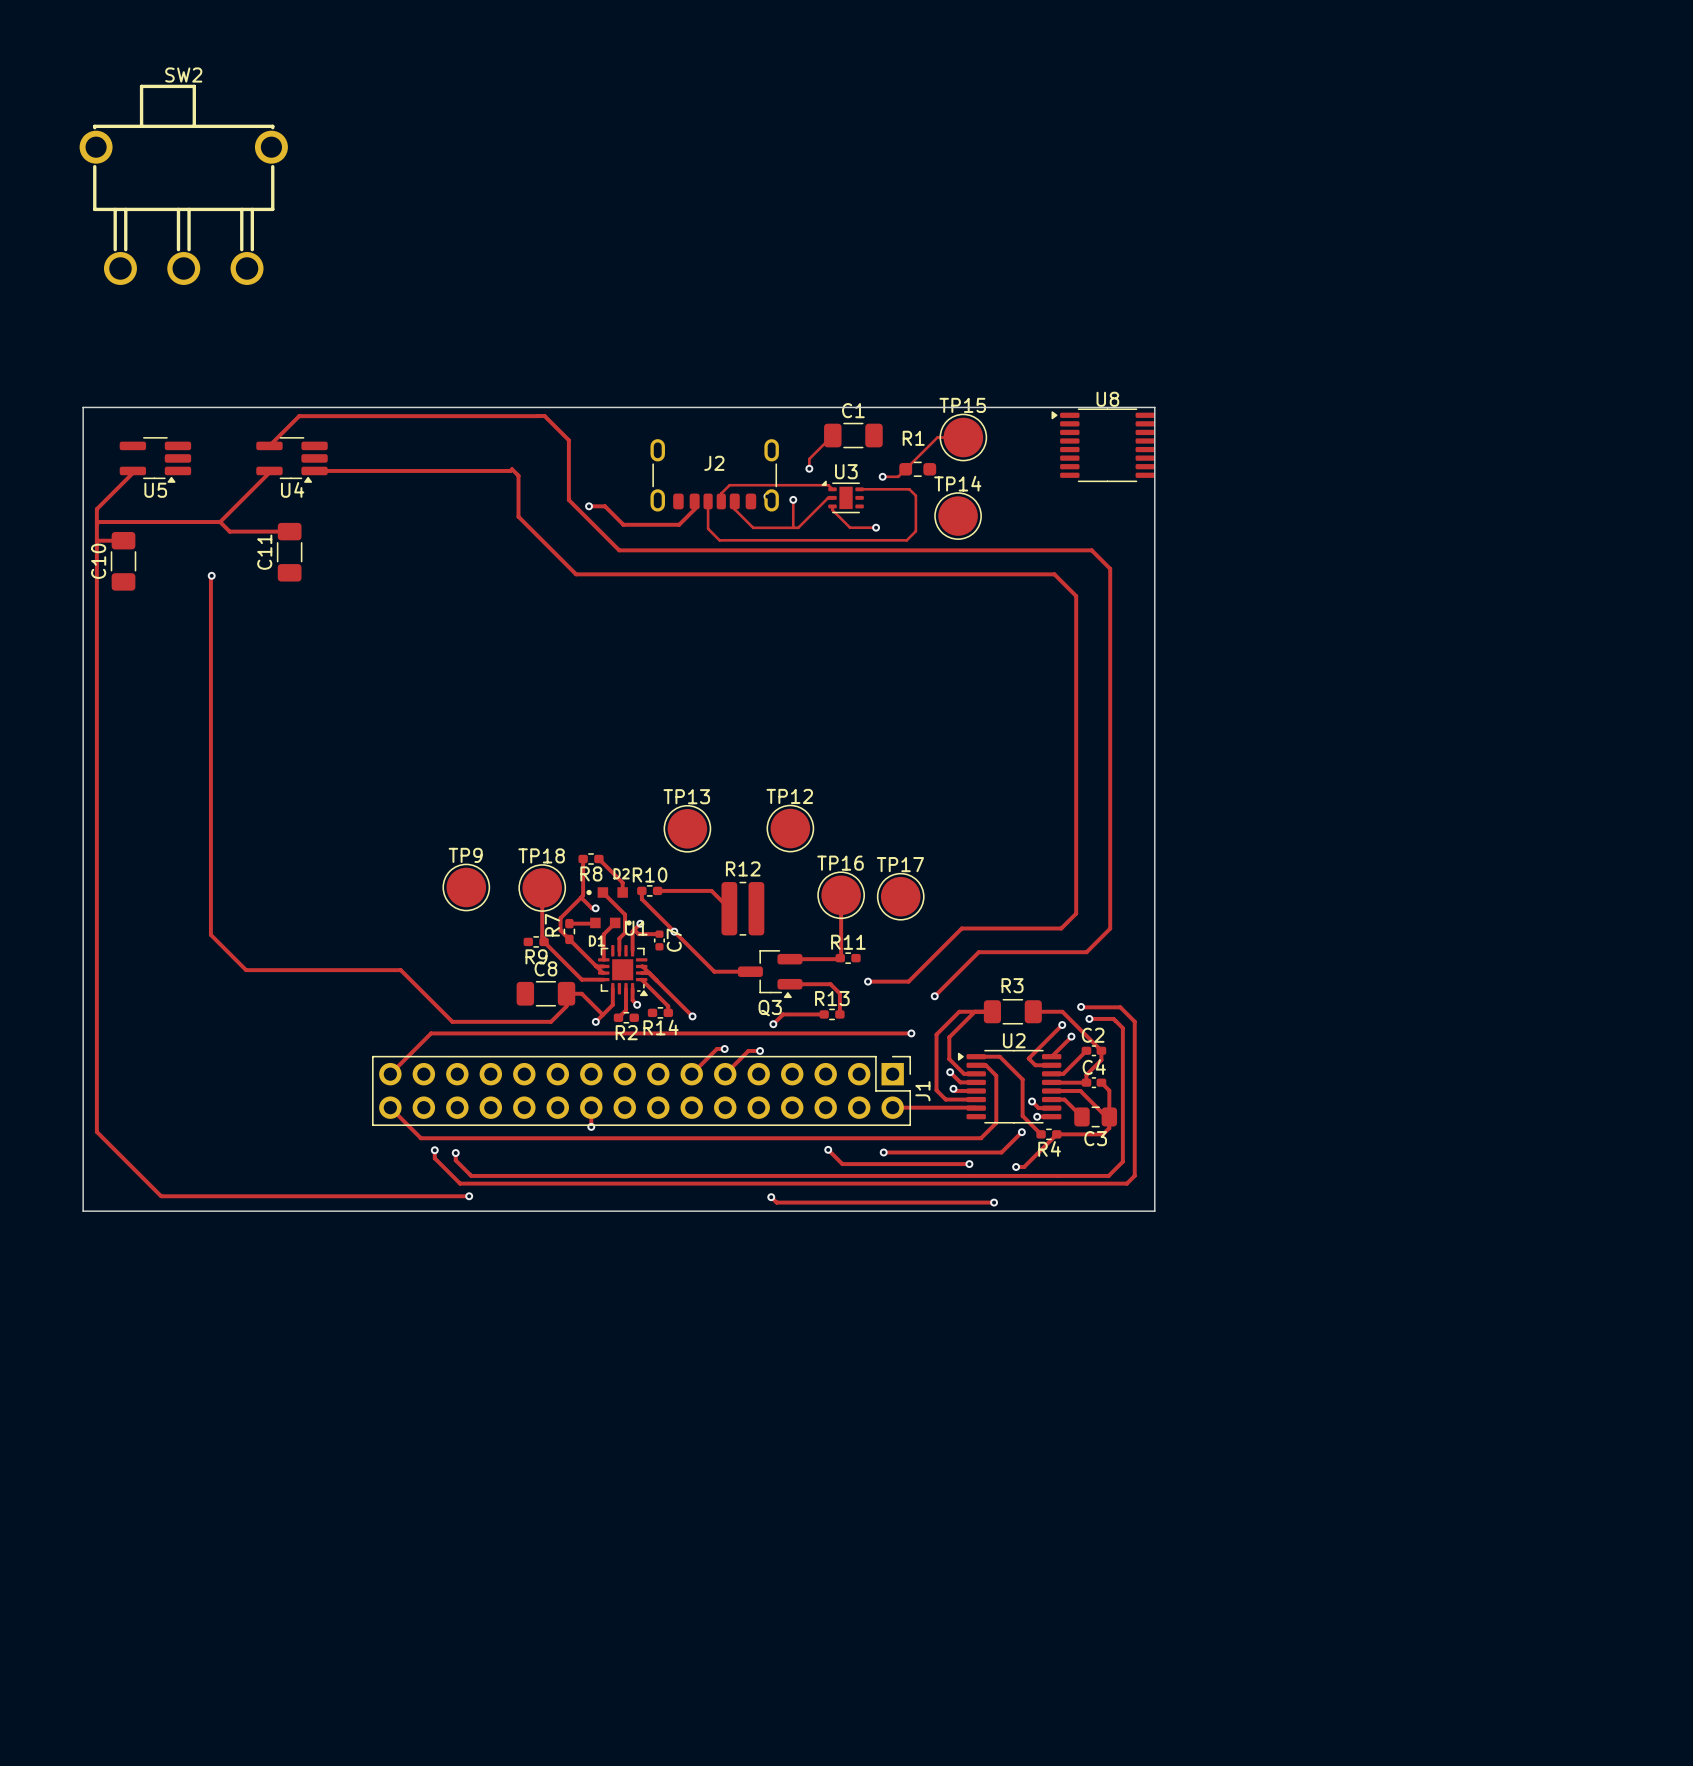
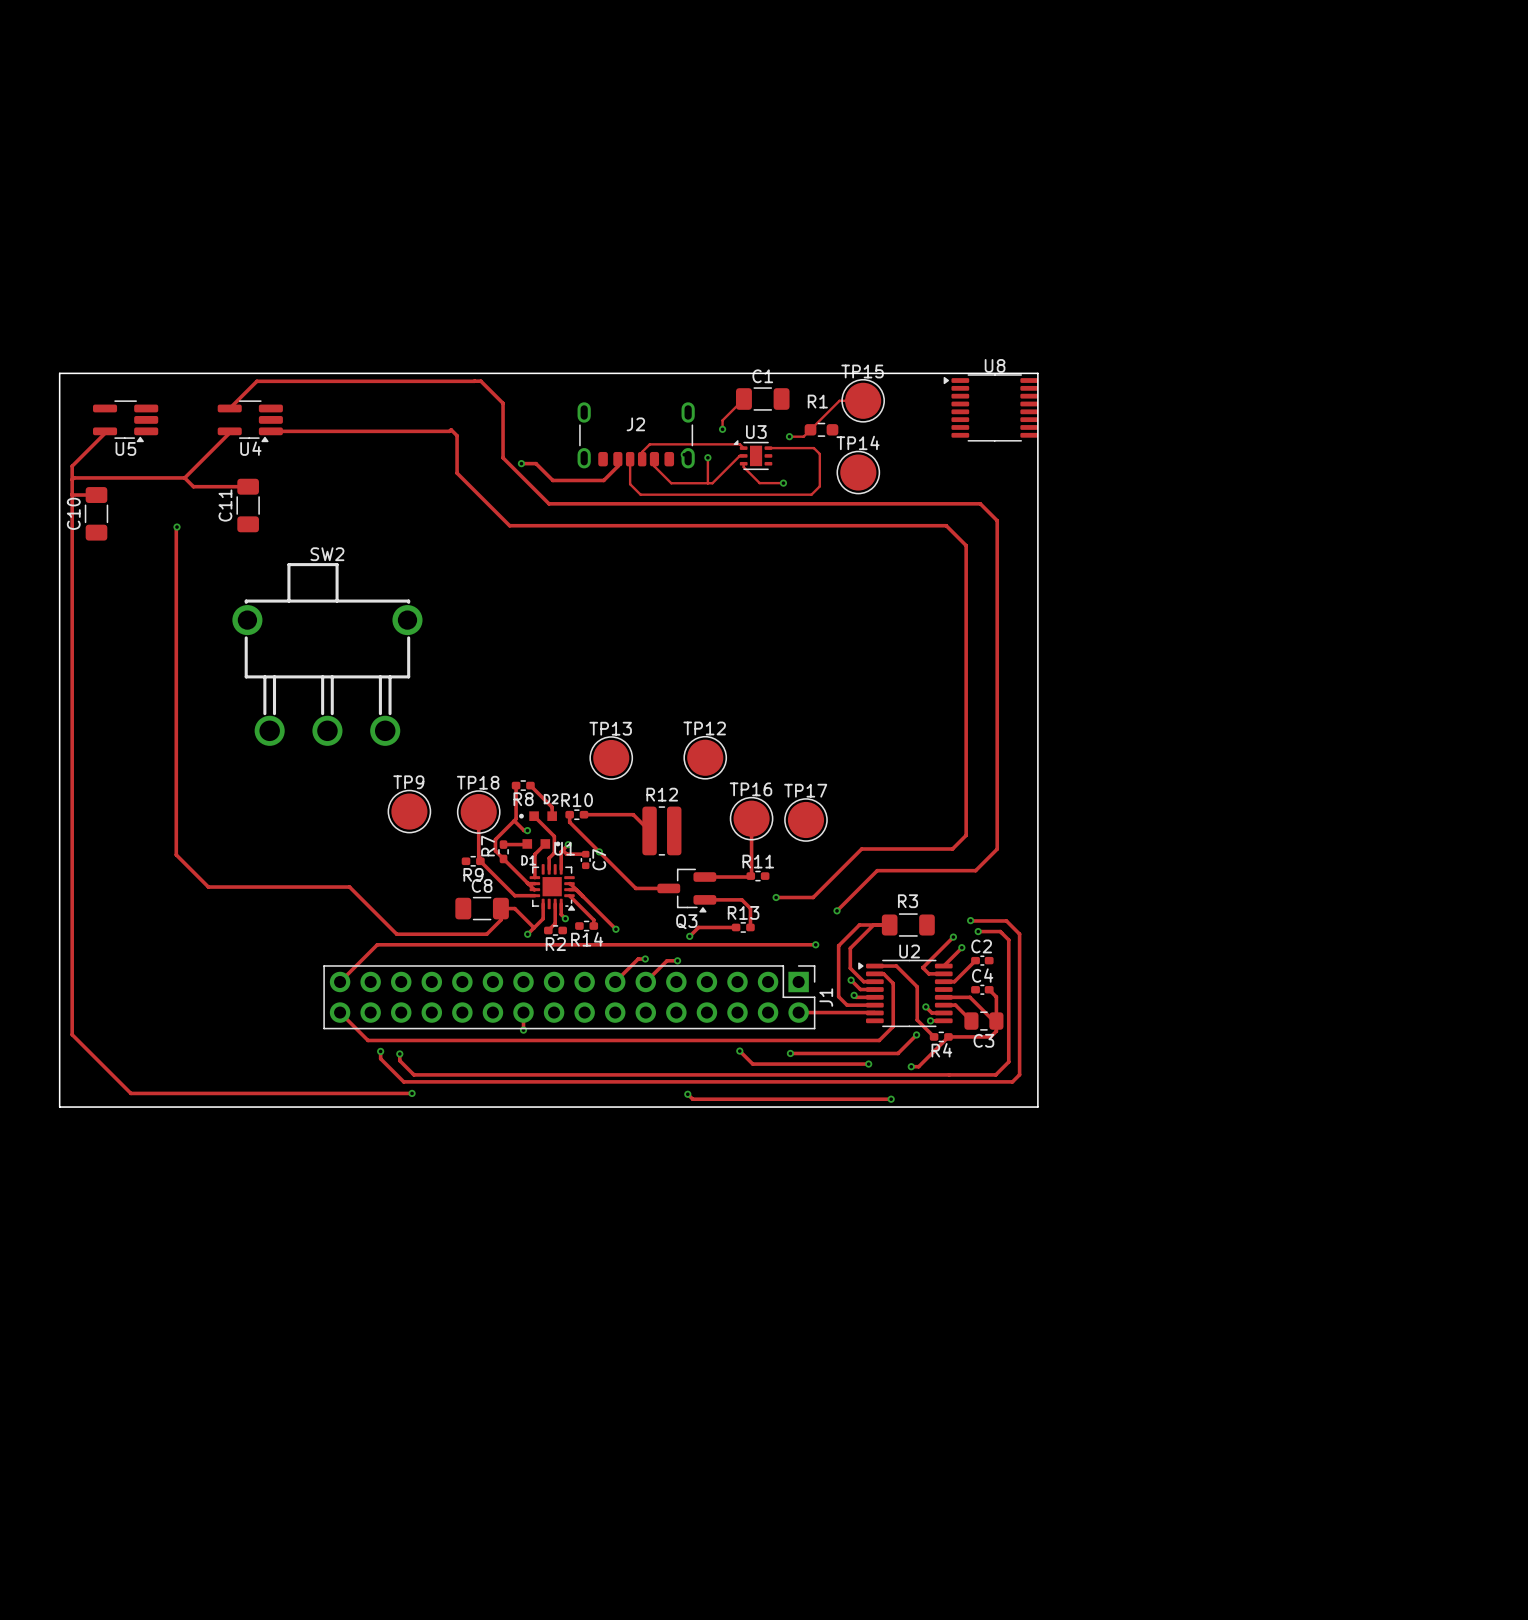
SW2 position: (183, 184) -> (327, 654)
track: (1033, 1011) (1062, 1011) (1101, 1050) (1101, 1060) (1086, 1075) (1086, 1082) (1051, 1082) -> none

